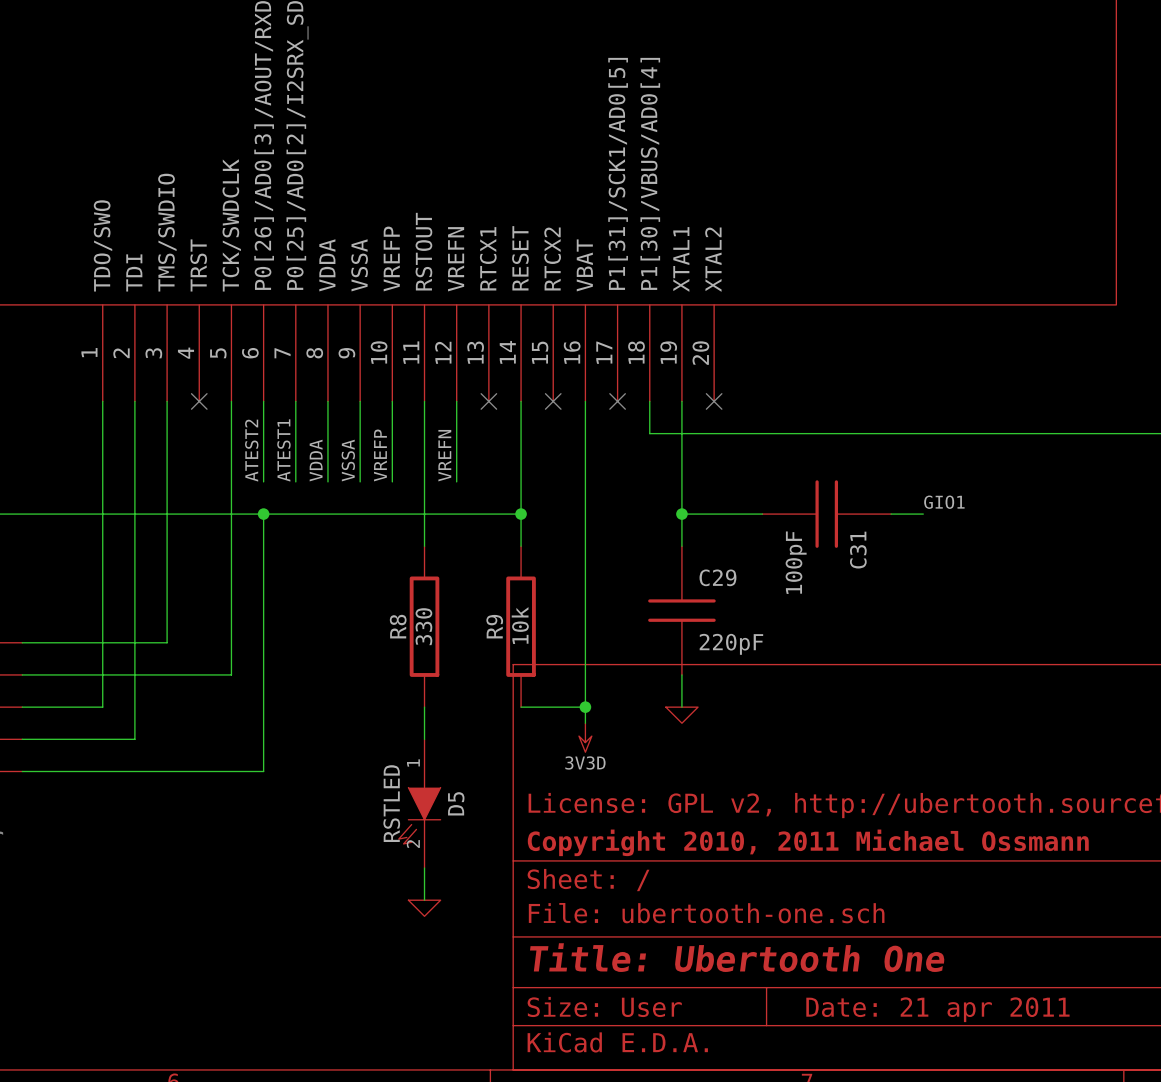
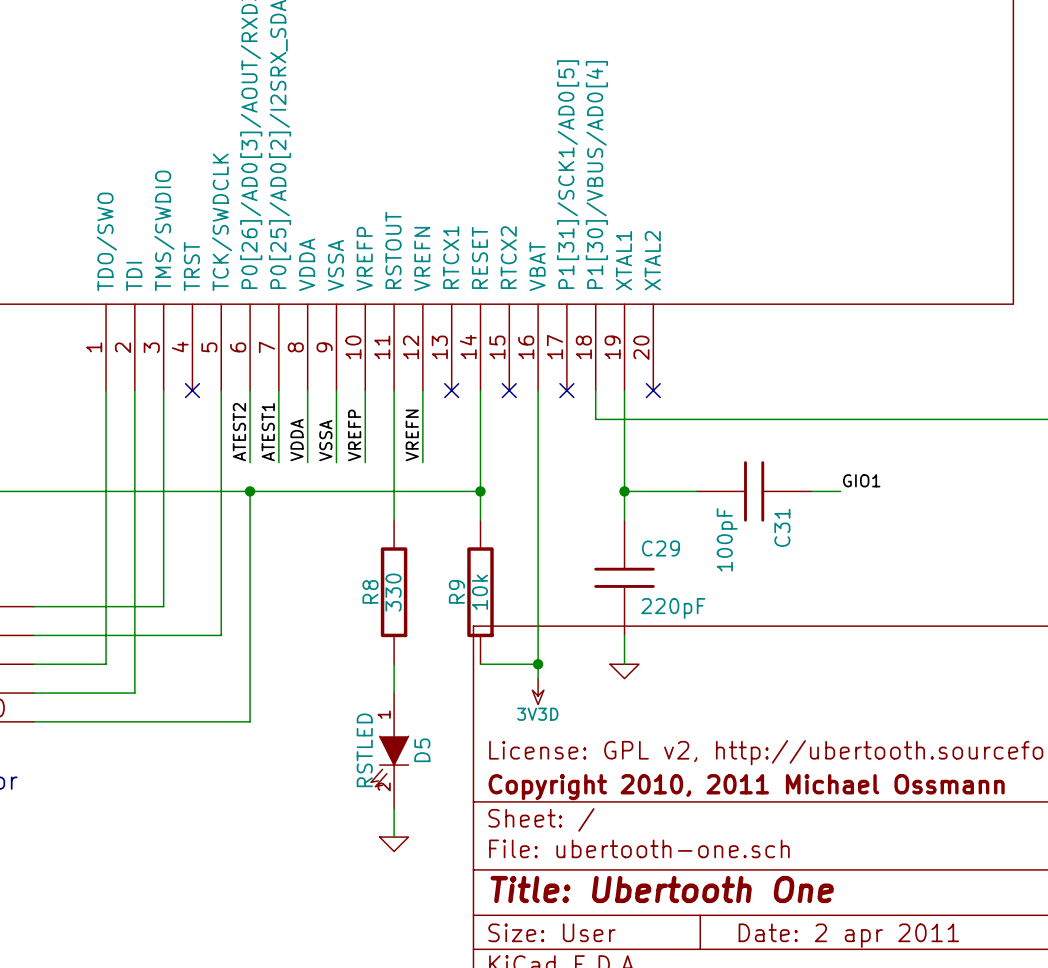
title block: Date: 21 apr 2011 (937, 1009) -> Date: 2 apr 2011 (848, 935)

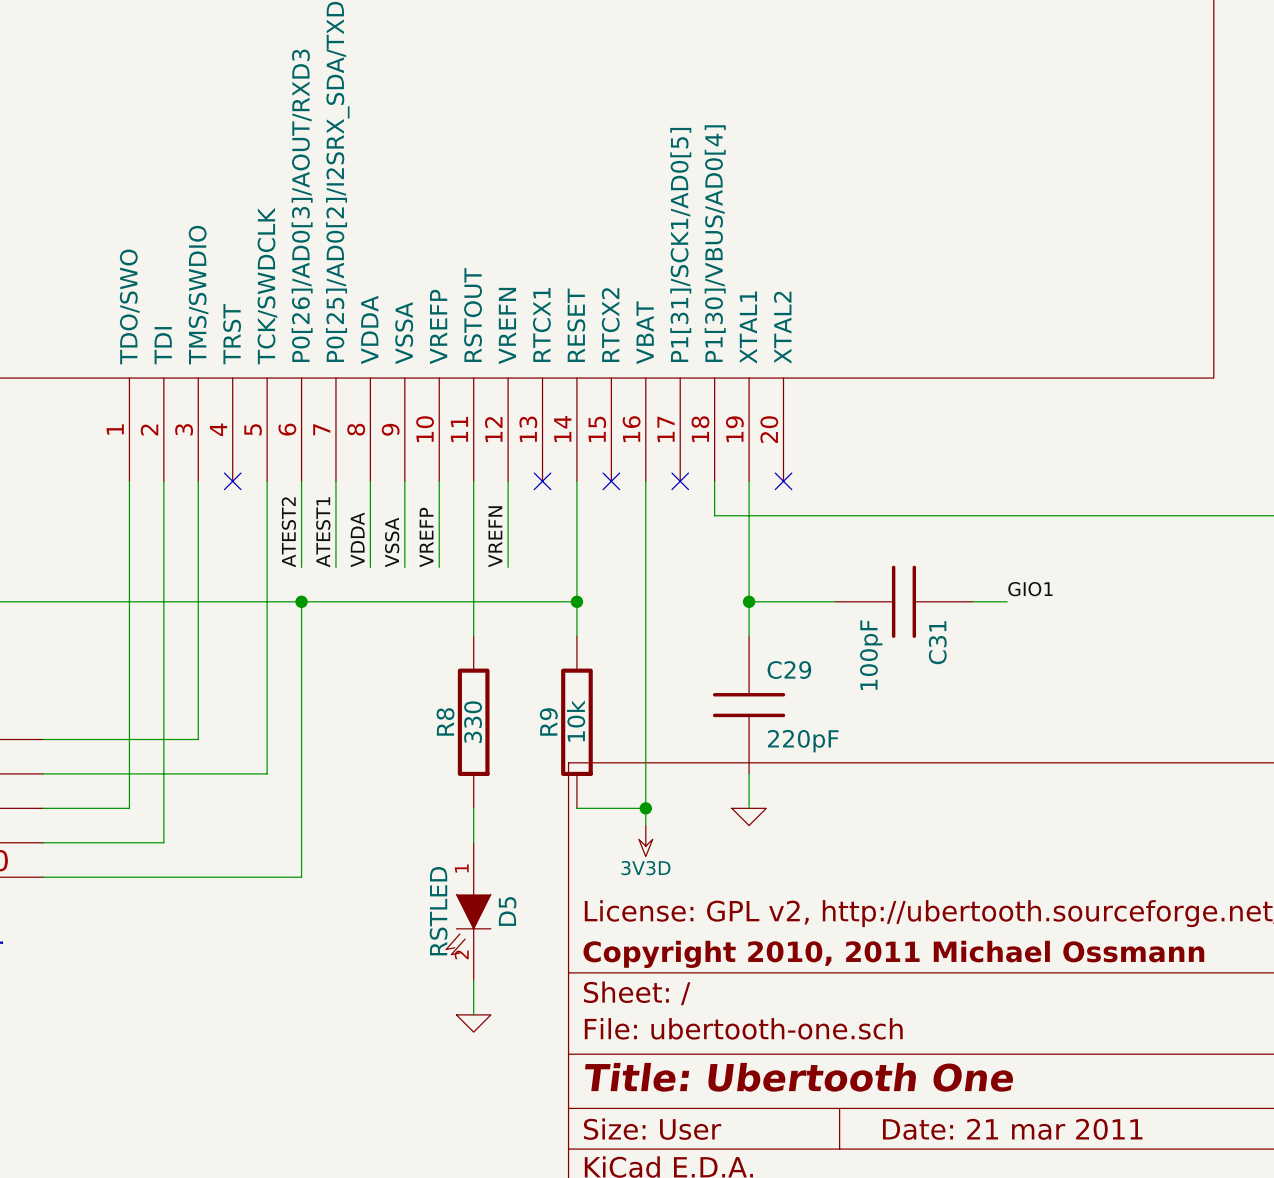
title block: Date: 2 apr 2011 (848, 935) -> Date: 21 mar 2011 (1012, 1129)

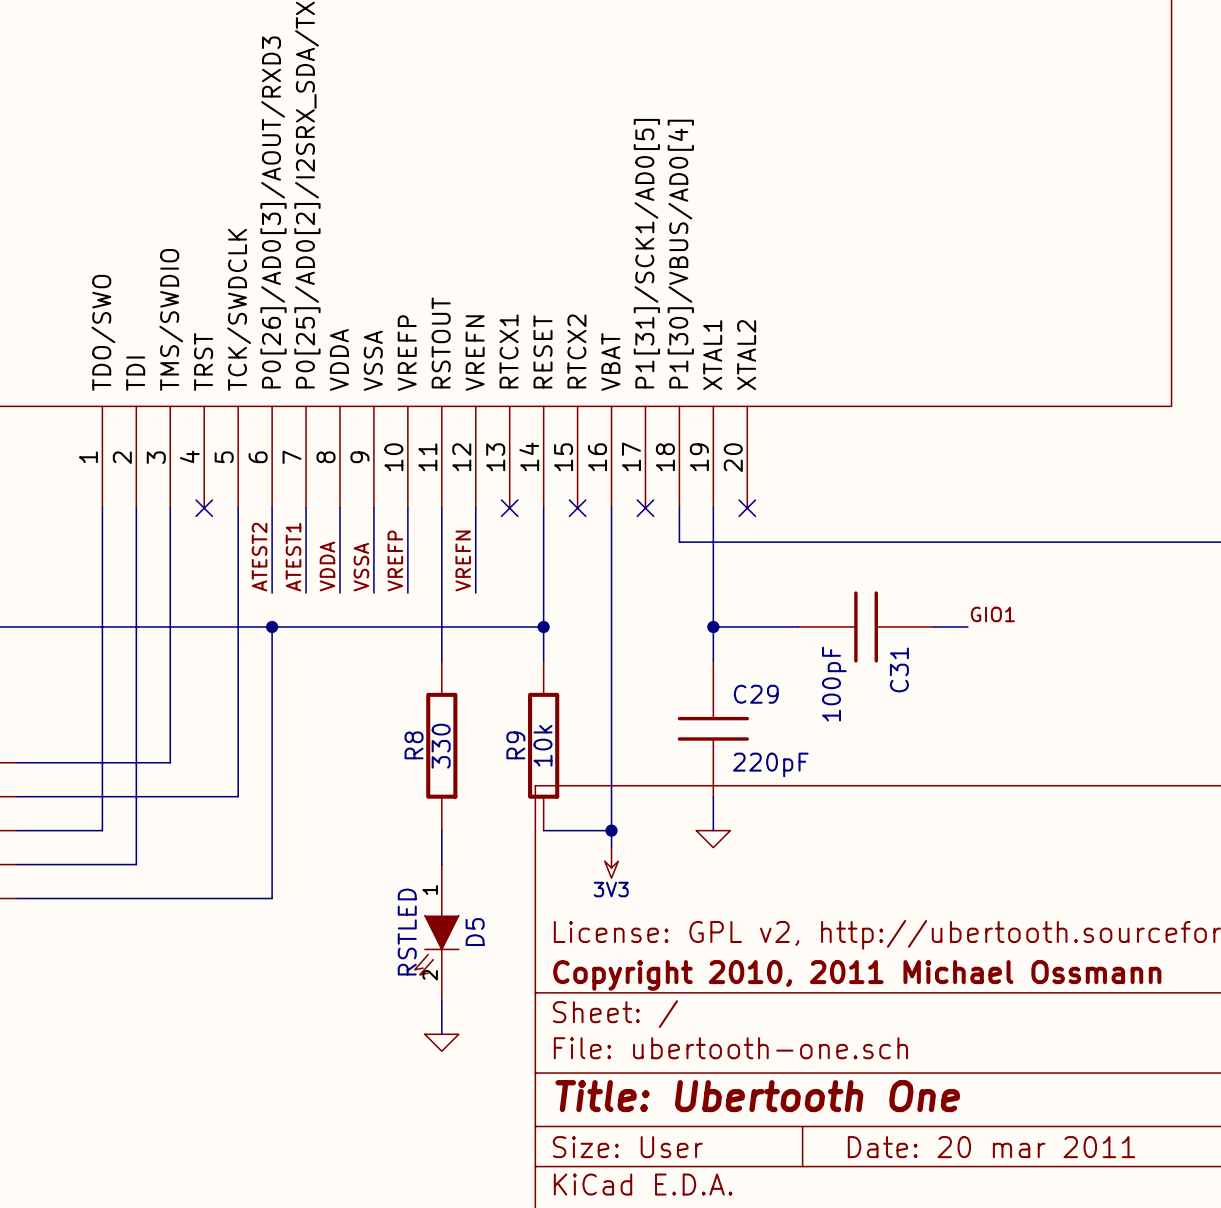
power symbol: 3V3D (645, 841) -> 3V3 (611, 862)
title block: Date: 21 mar 2011 (1012, 1129) -> Date: 20 mar 2011 (991, 1147)

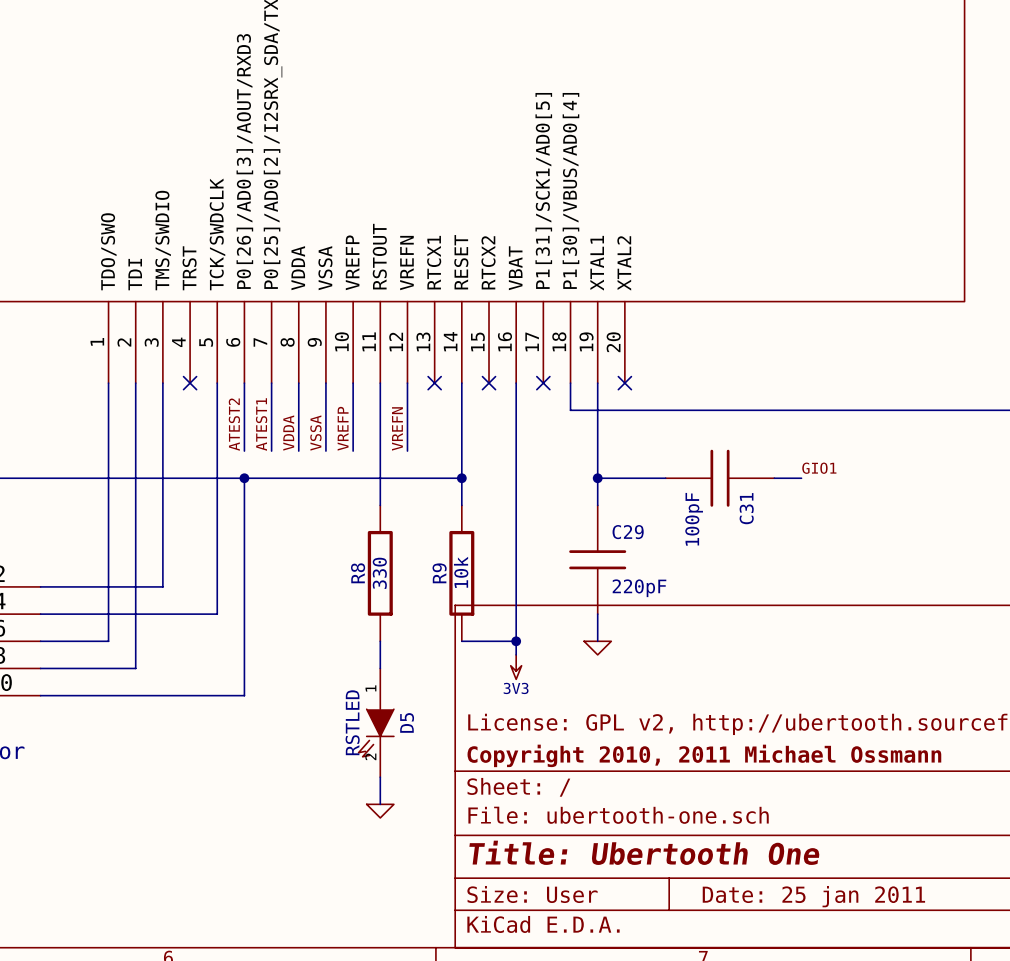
title block: Date: 20 mar 2011 (991, 1147) -> Date: 25 jan 2011 (813, 896)

